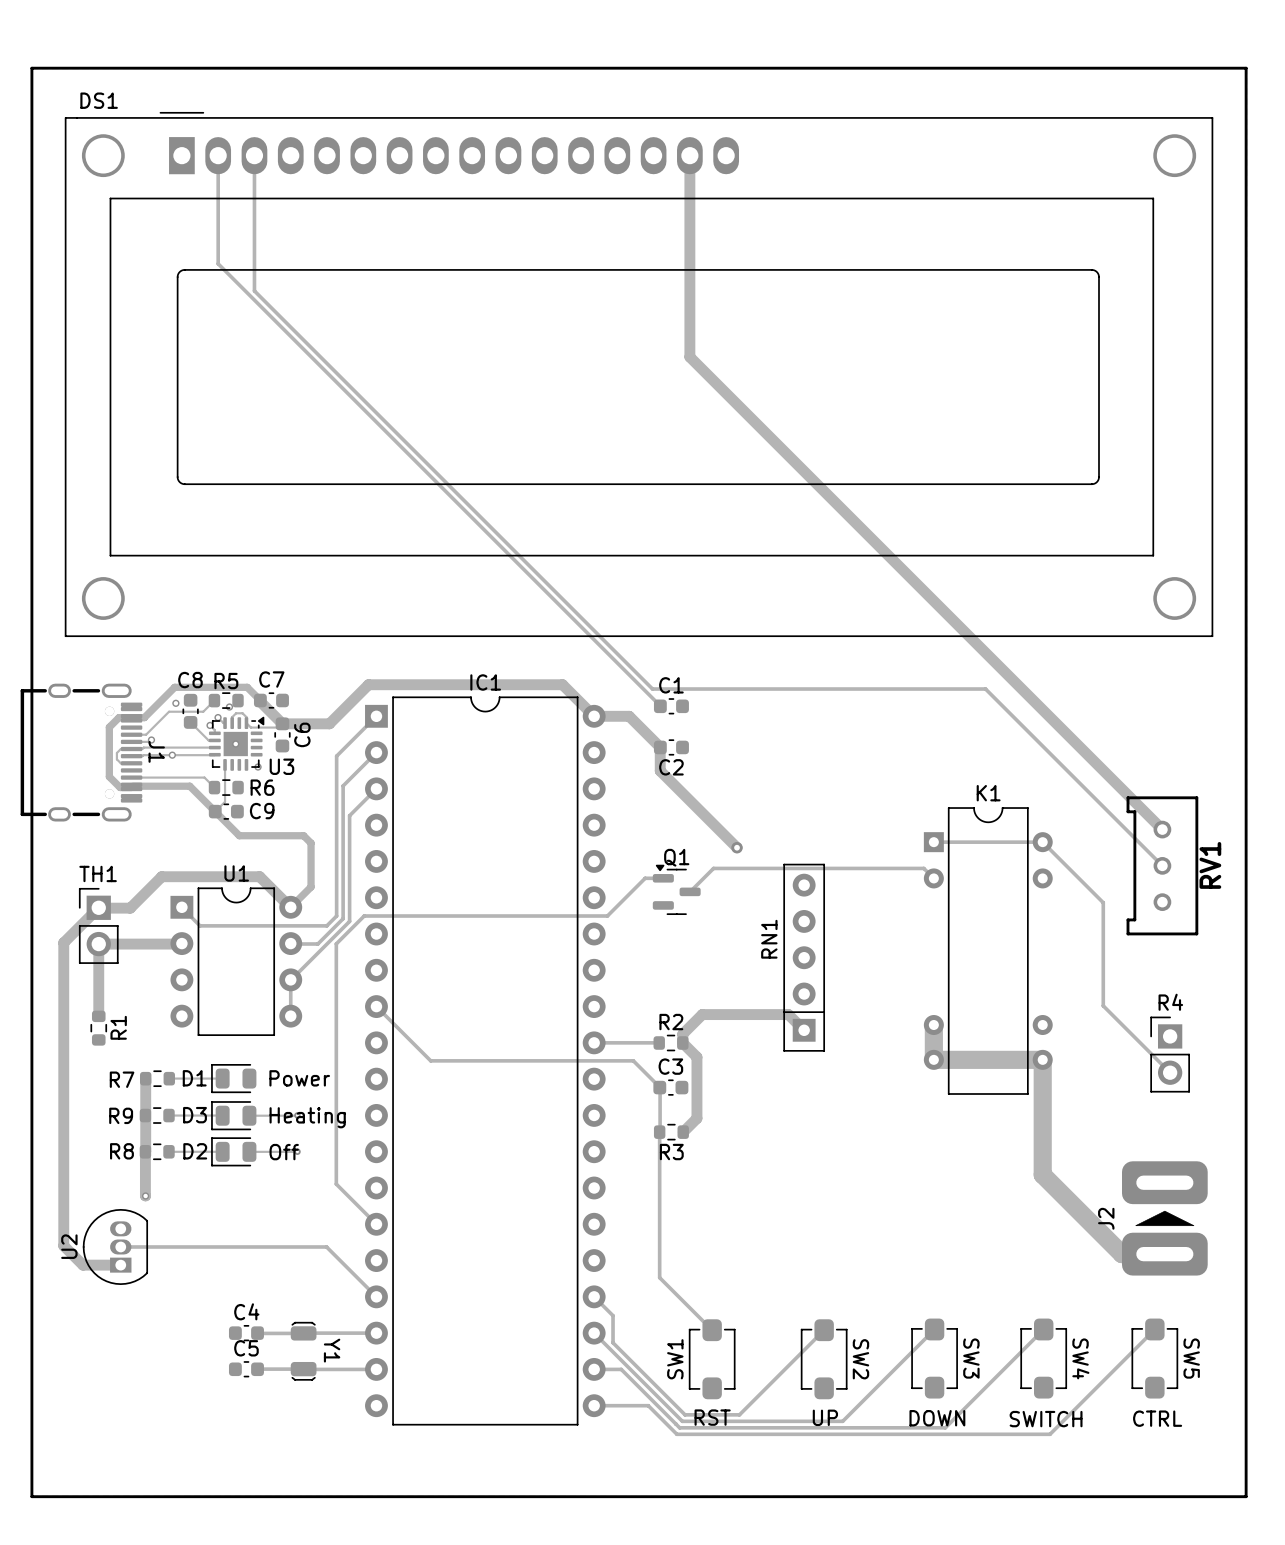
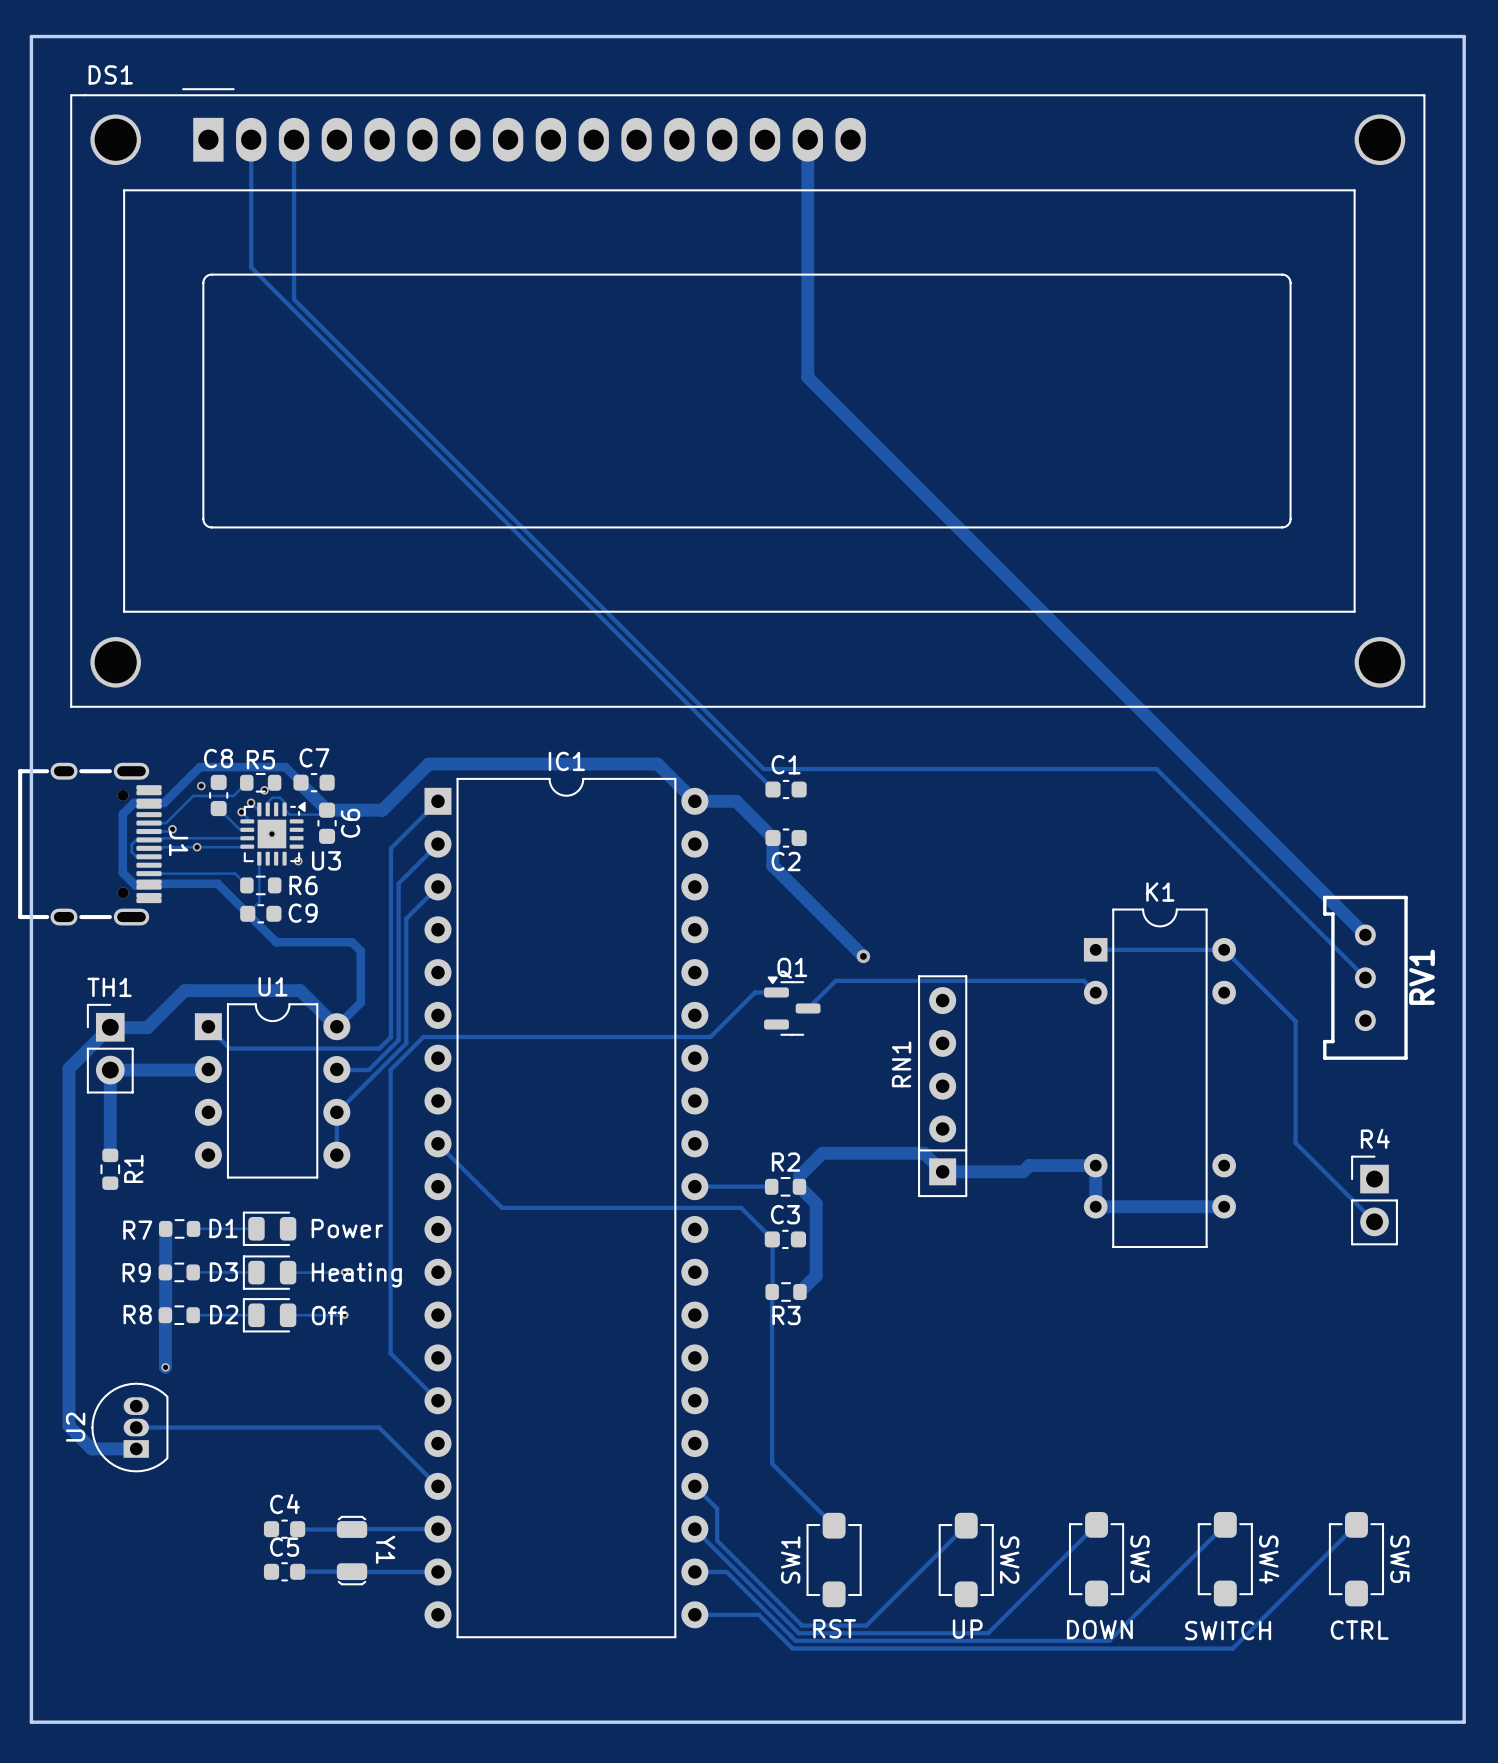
track: none -> (1095, 1165) (1029, 1165) (1023, 1171) (942, 1171)
track width: thick (933, 1025) (933, 1059) (1042, 1059) -> thin (1095, 1165) (1095, 1206) (1224, 1206)
track: (1042, 1059) (1042, 1174) (1121, 1254) (1164, 1254) -> none
J2: (1164, 1218) -> none

